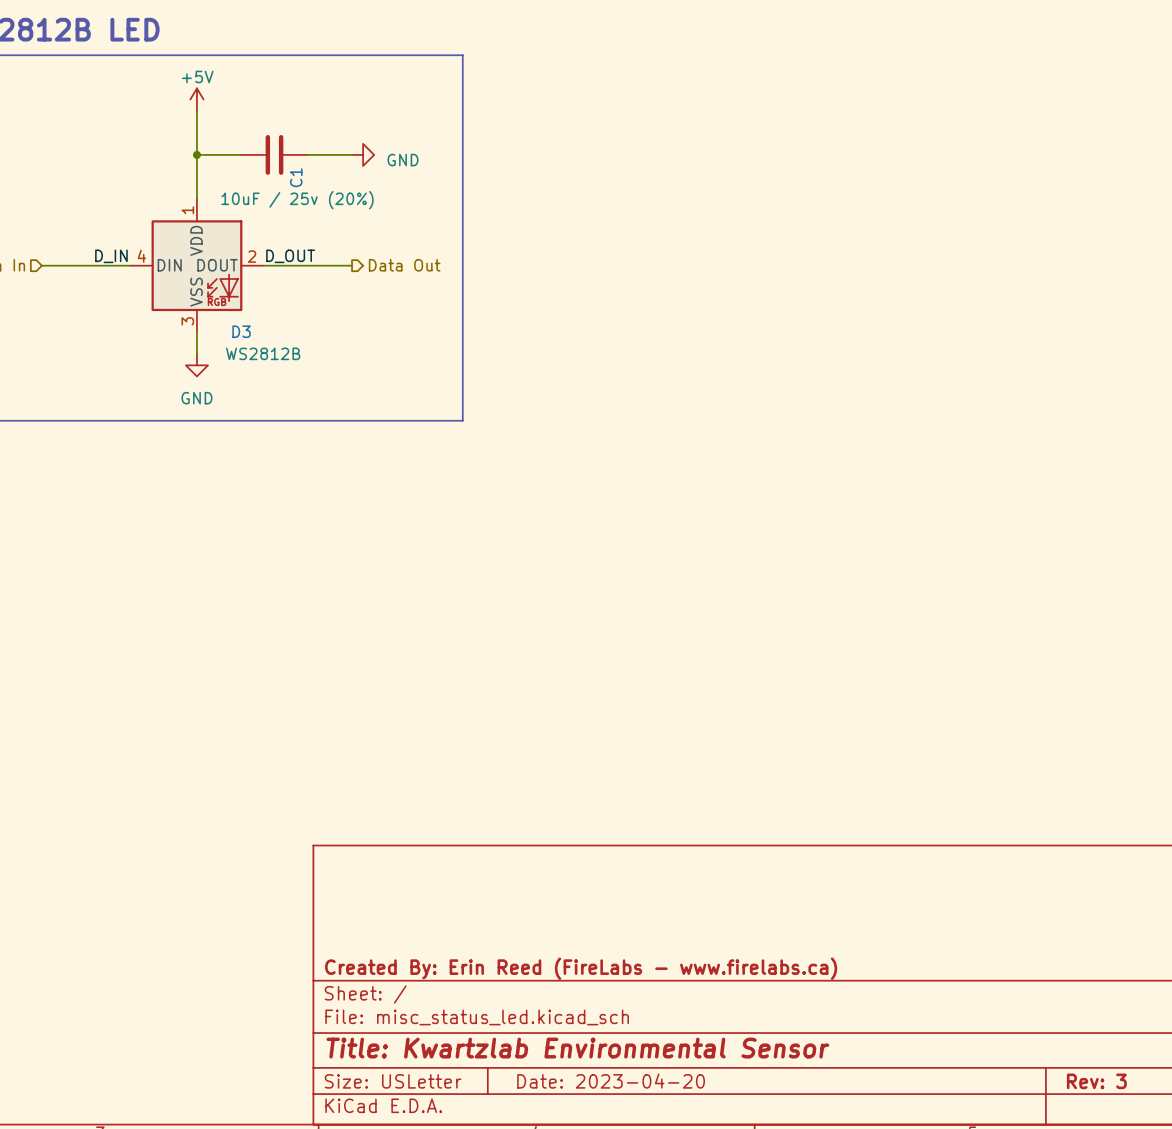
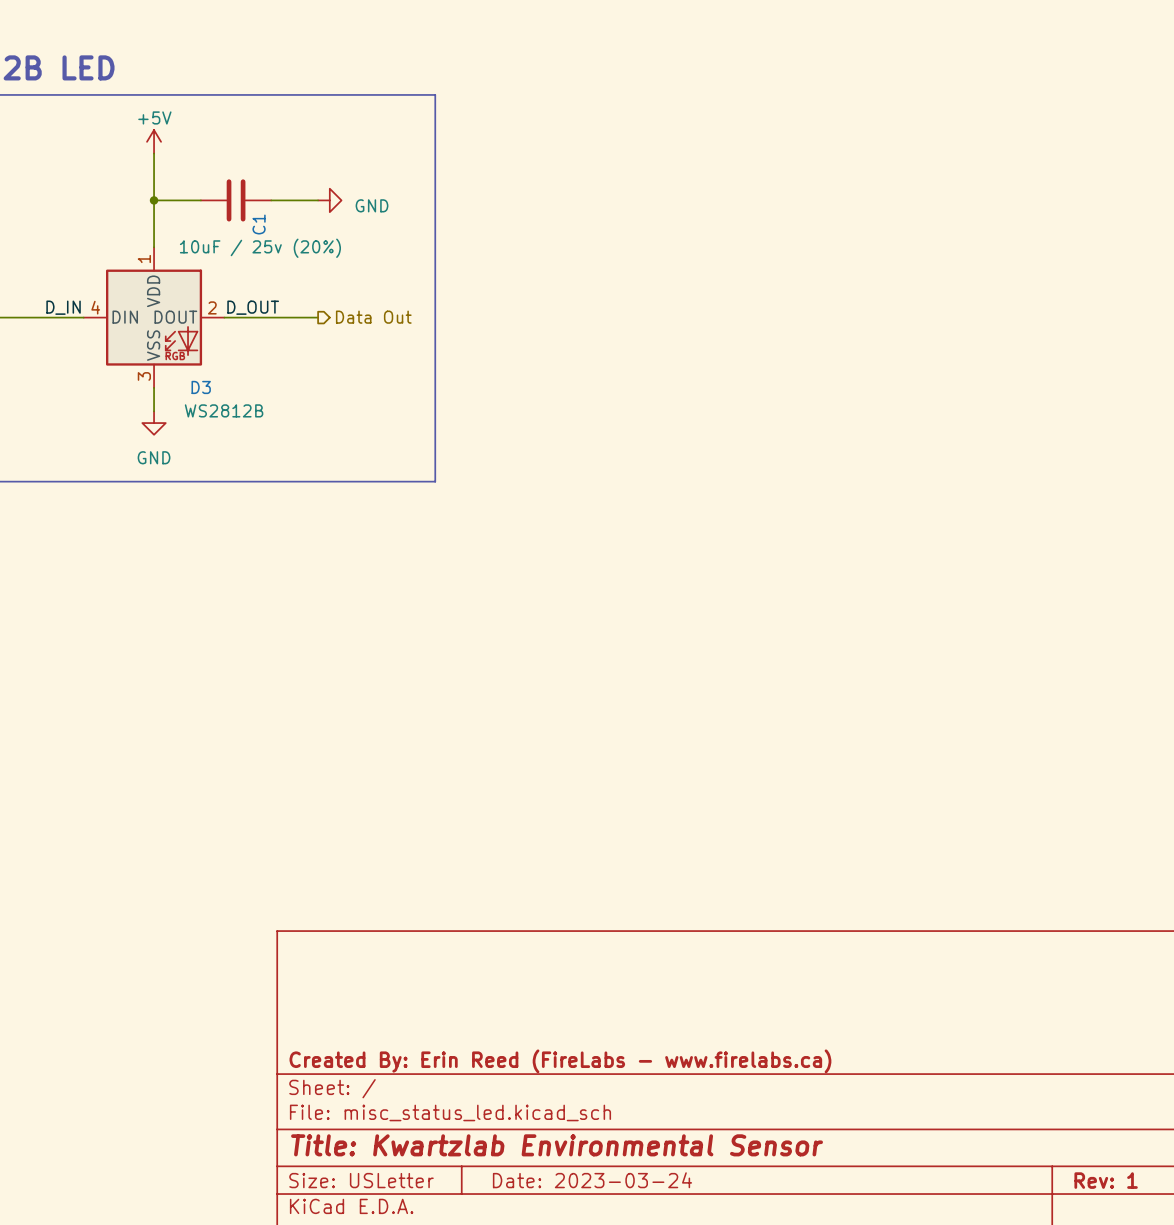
title block: Date: 2023-04-20 (611, 1081) -> Date: 2023-03-24 (592, 1180)
title block: Rev: 3 (1096, 1081) -> Rev: 1 (1106, 1180)

